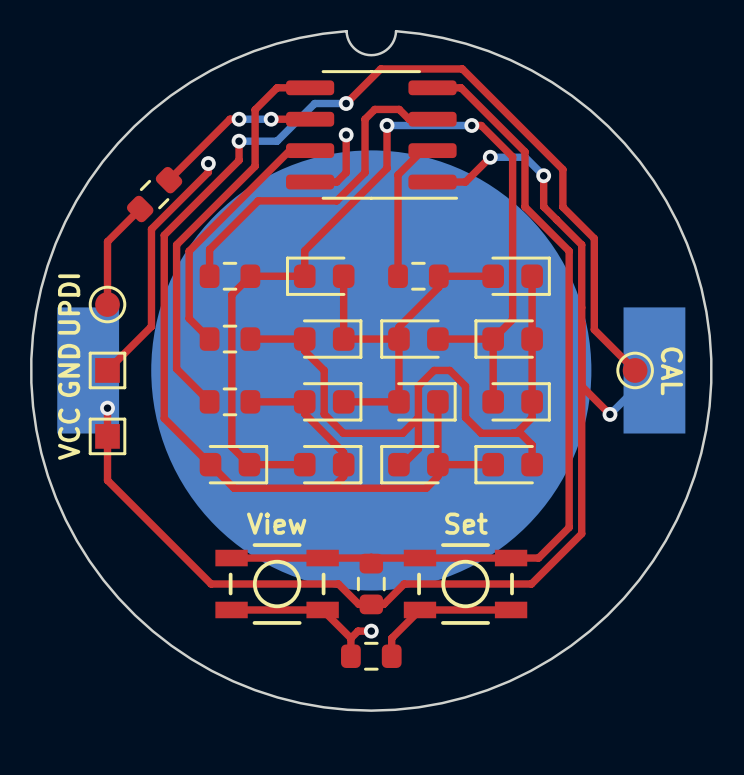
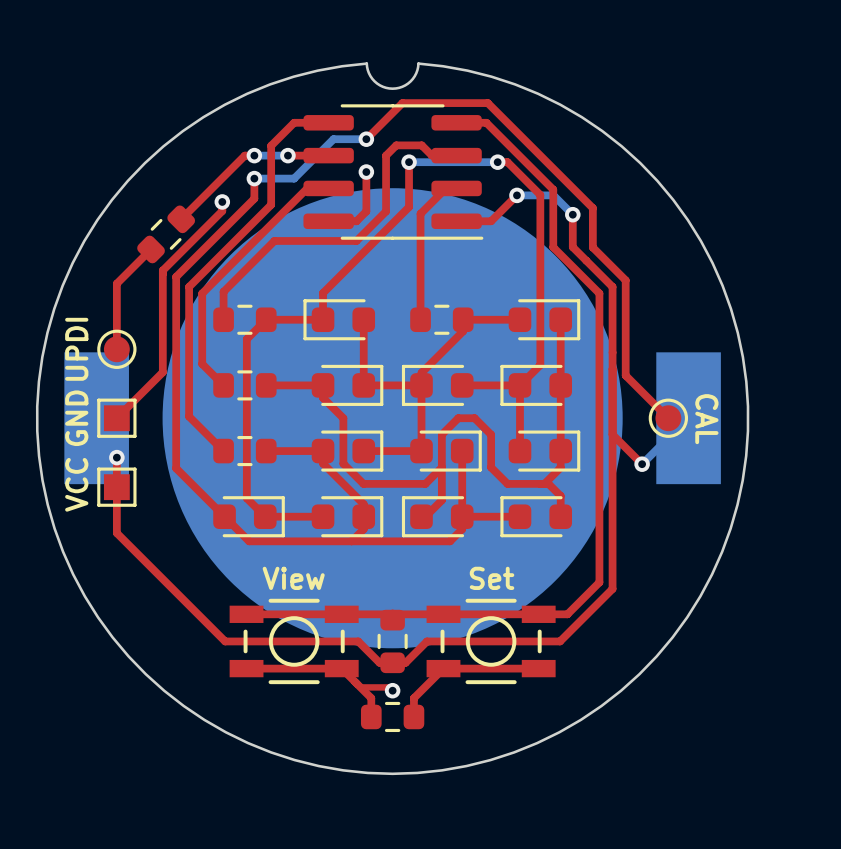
top track: none -> (356, 683) (360, 687) (392, 687)
top track: (371, 631) (358, 631) (350, 638) -> none

